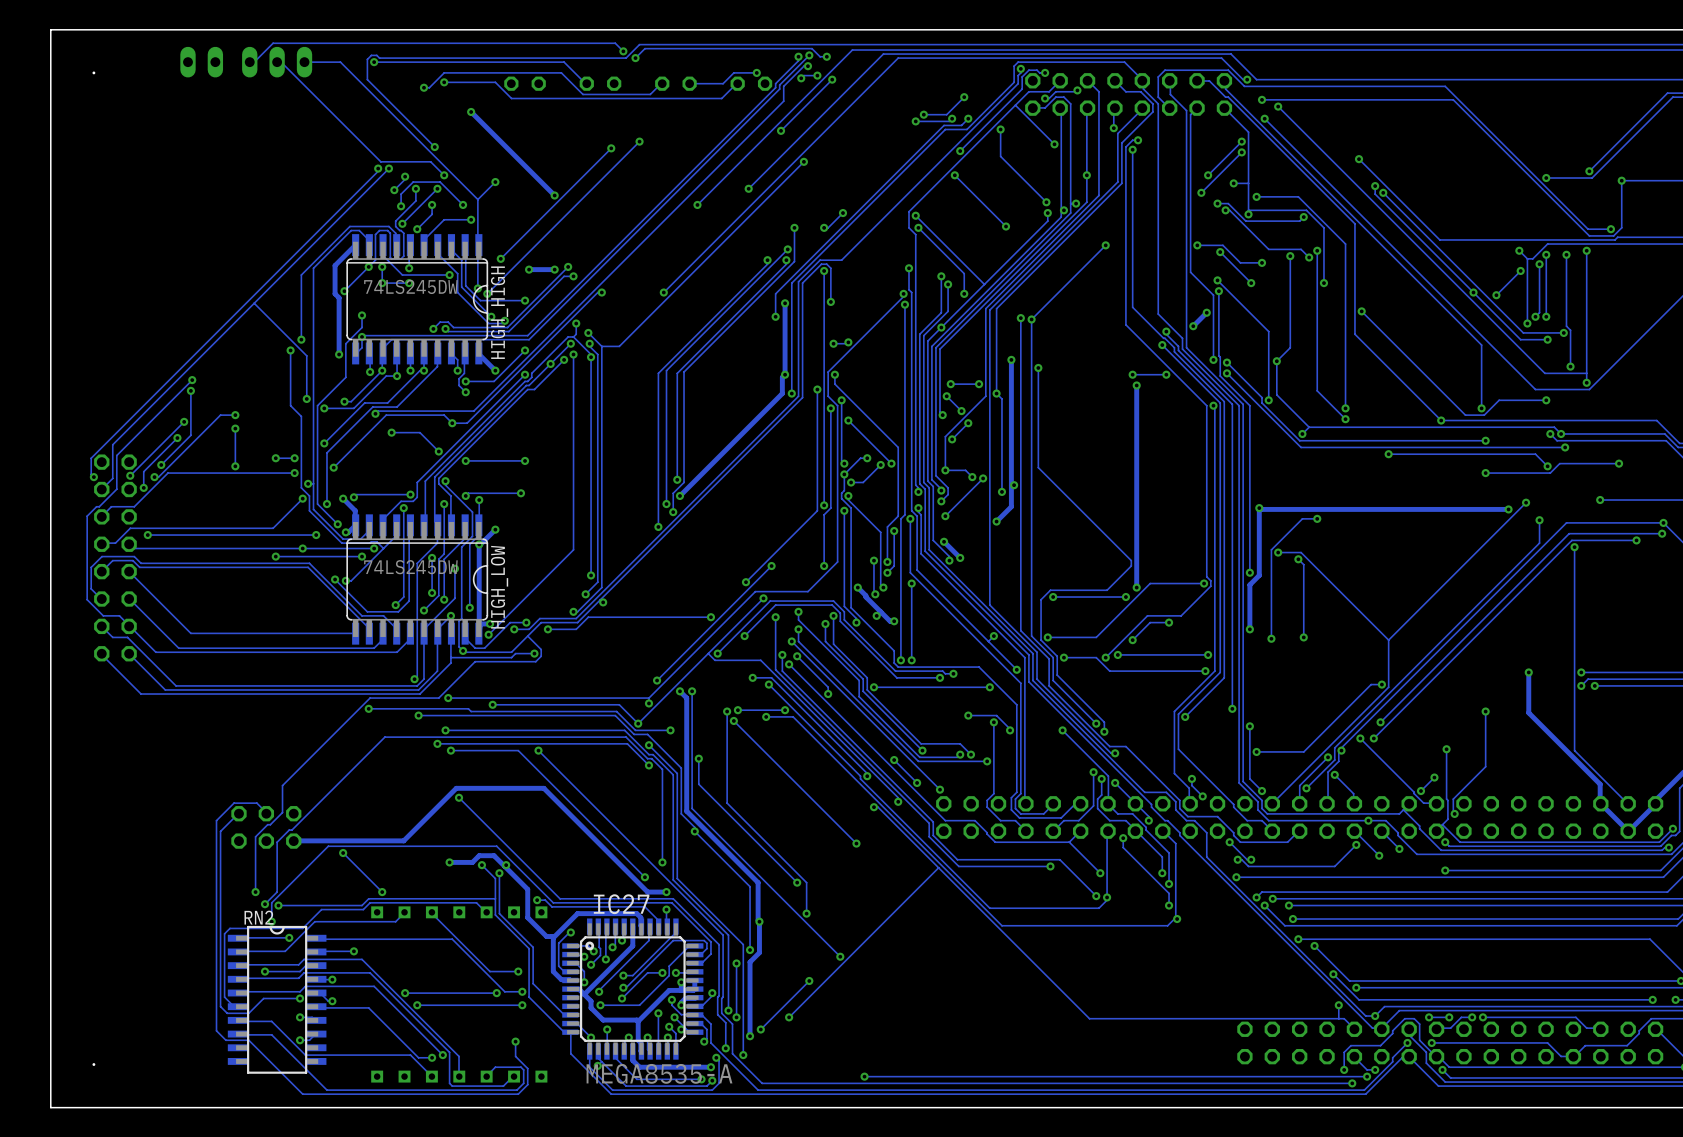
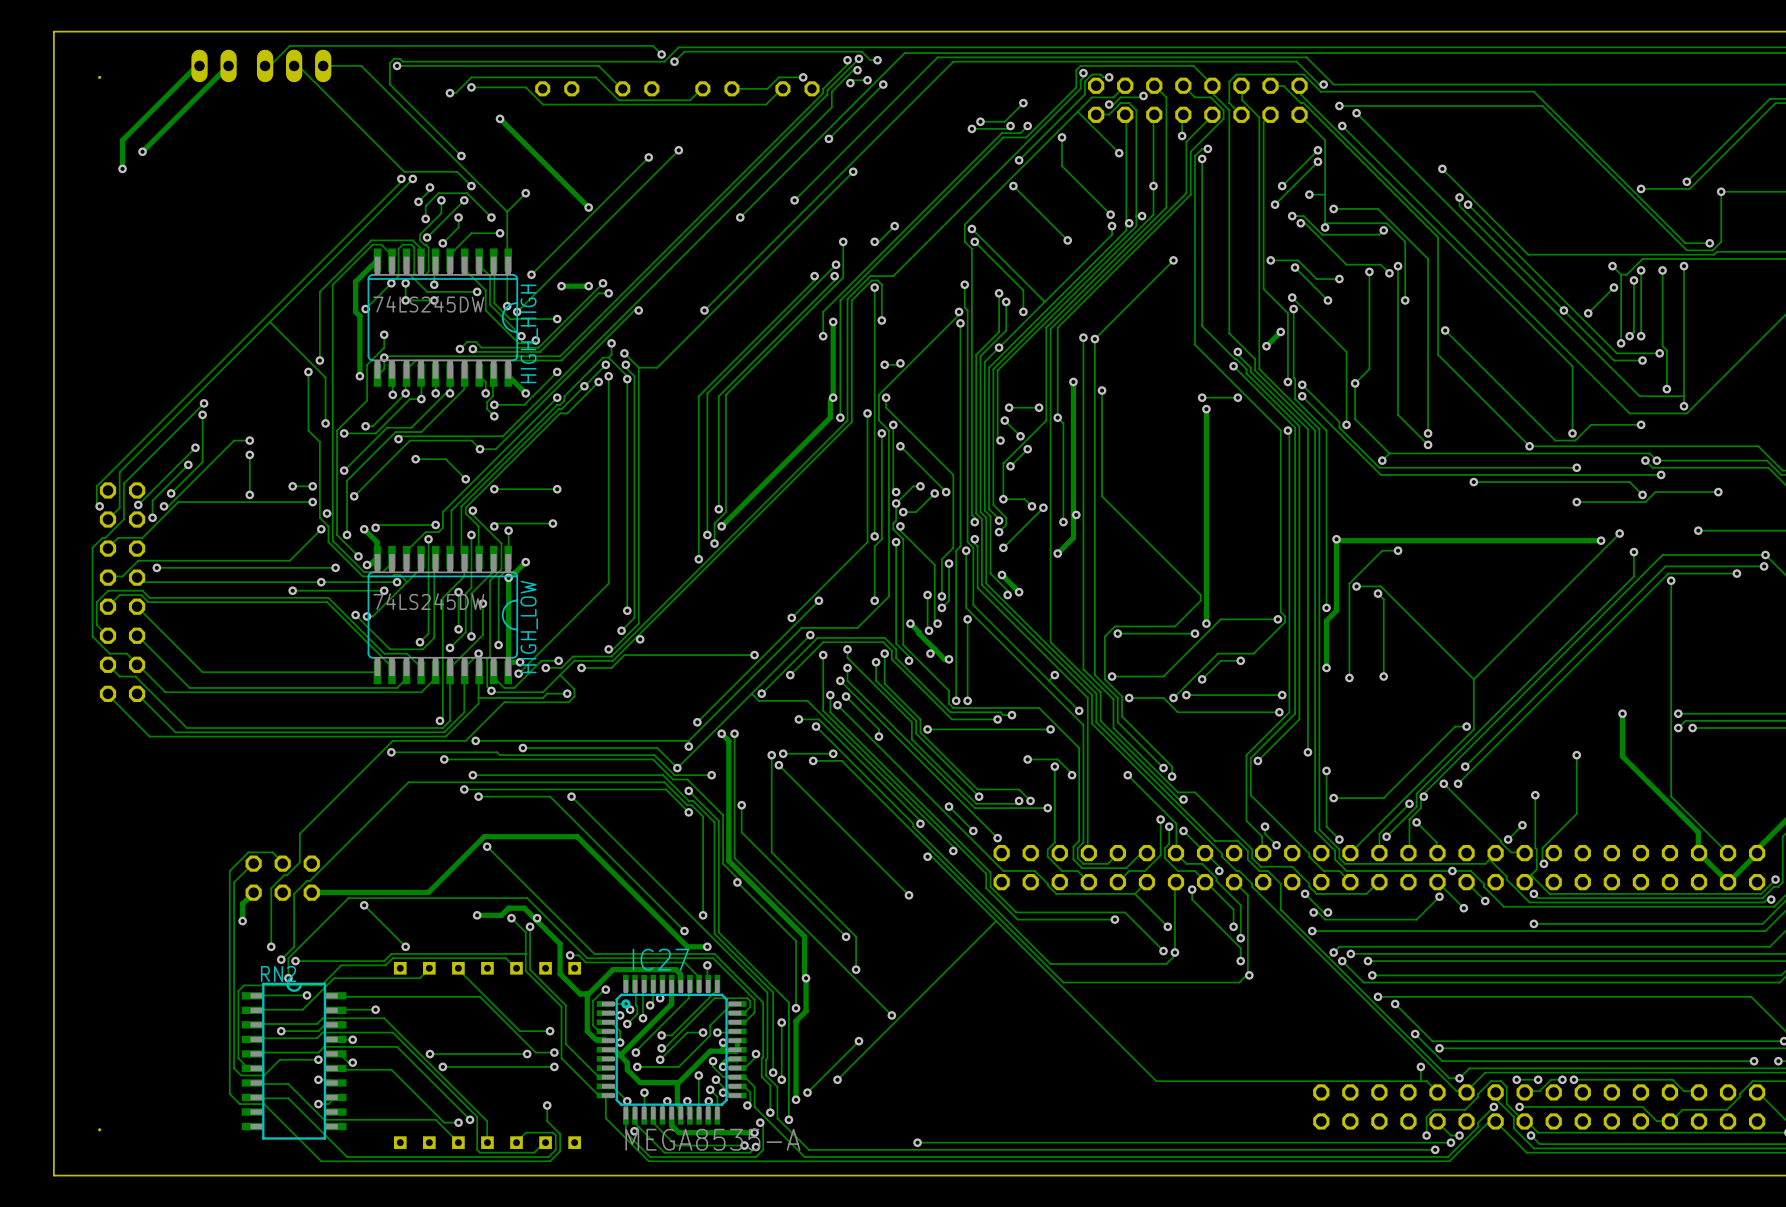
track: none -> (199, 65) (196, 65) (122, 140) (122, 168)
track: none -> (228, 65) (142, 151)
via: none -> (142, 151)
via: none -> (122, 168)
track: none -> (253, 892) (242, 903) (242, 921)
via: none -> (242, 921)

